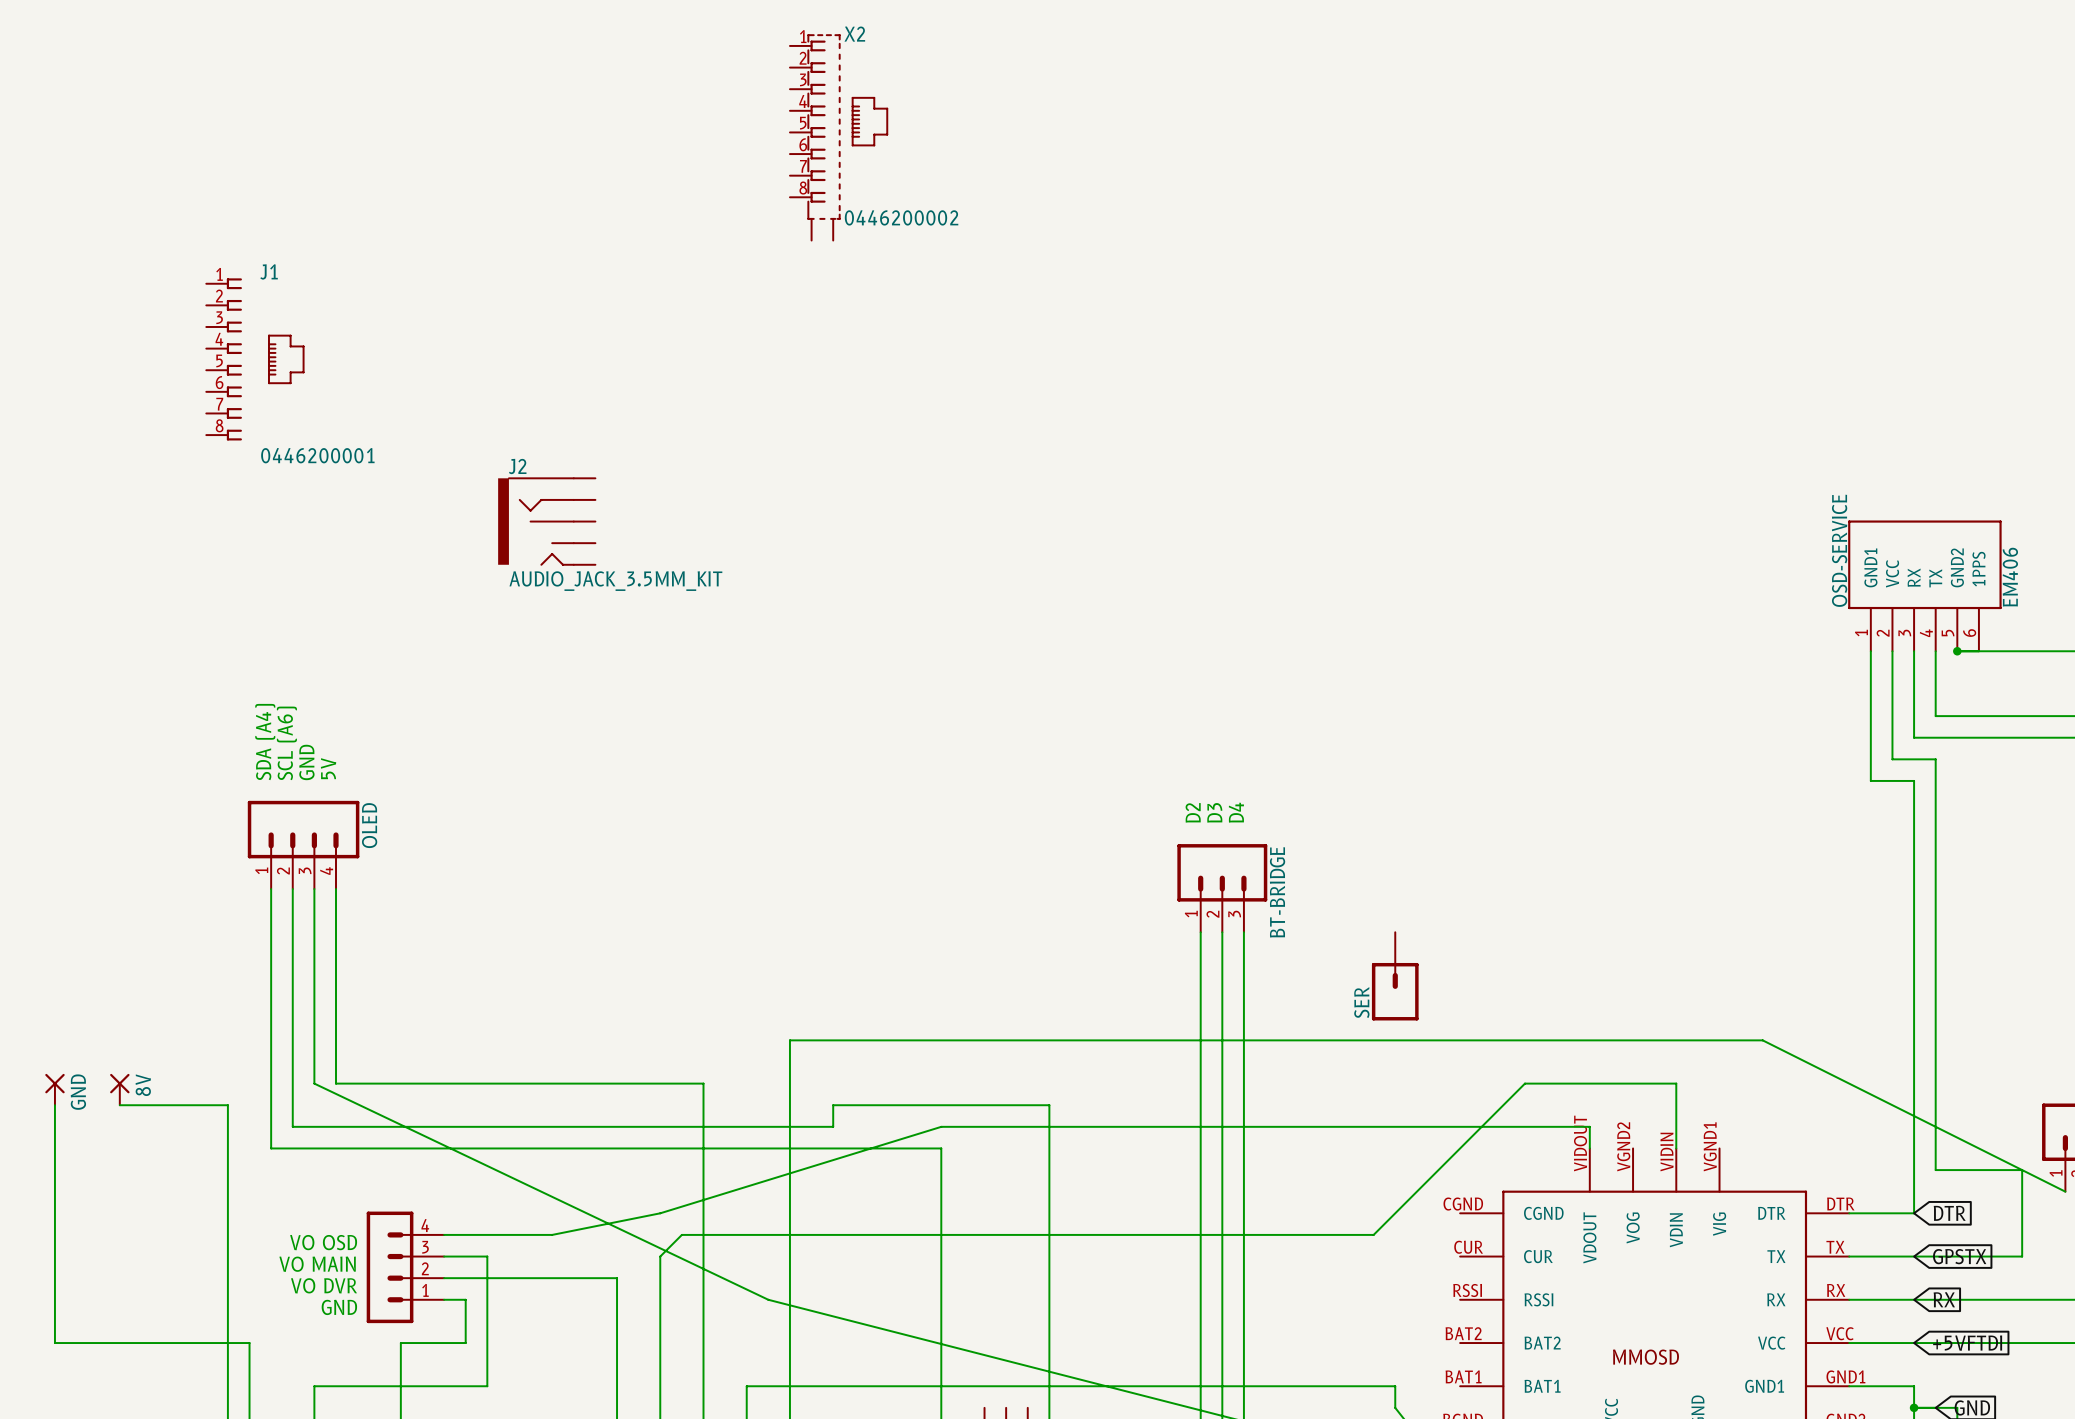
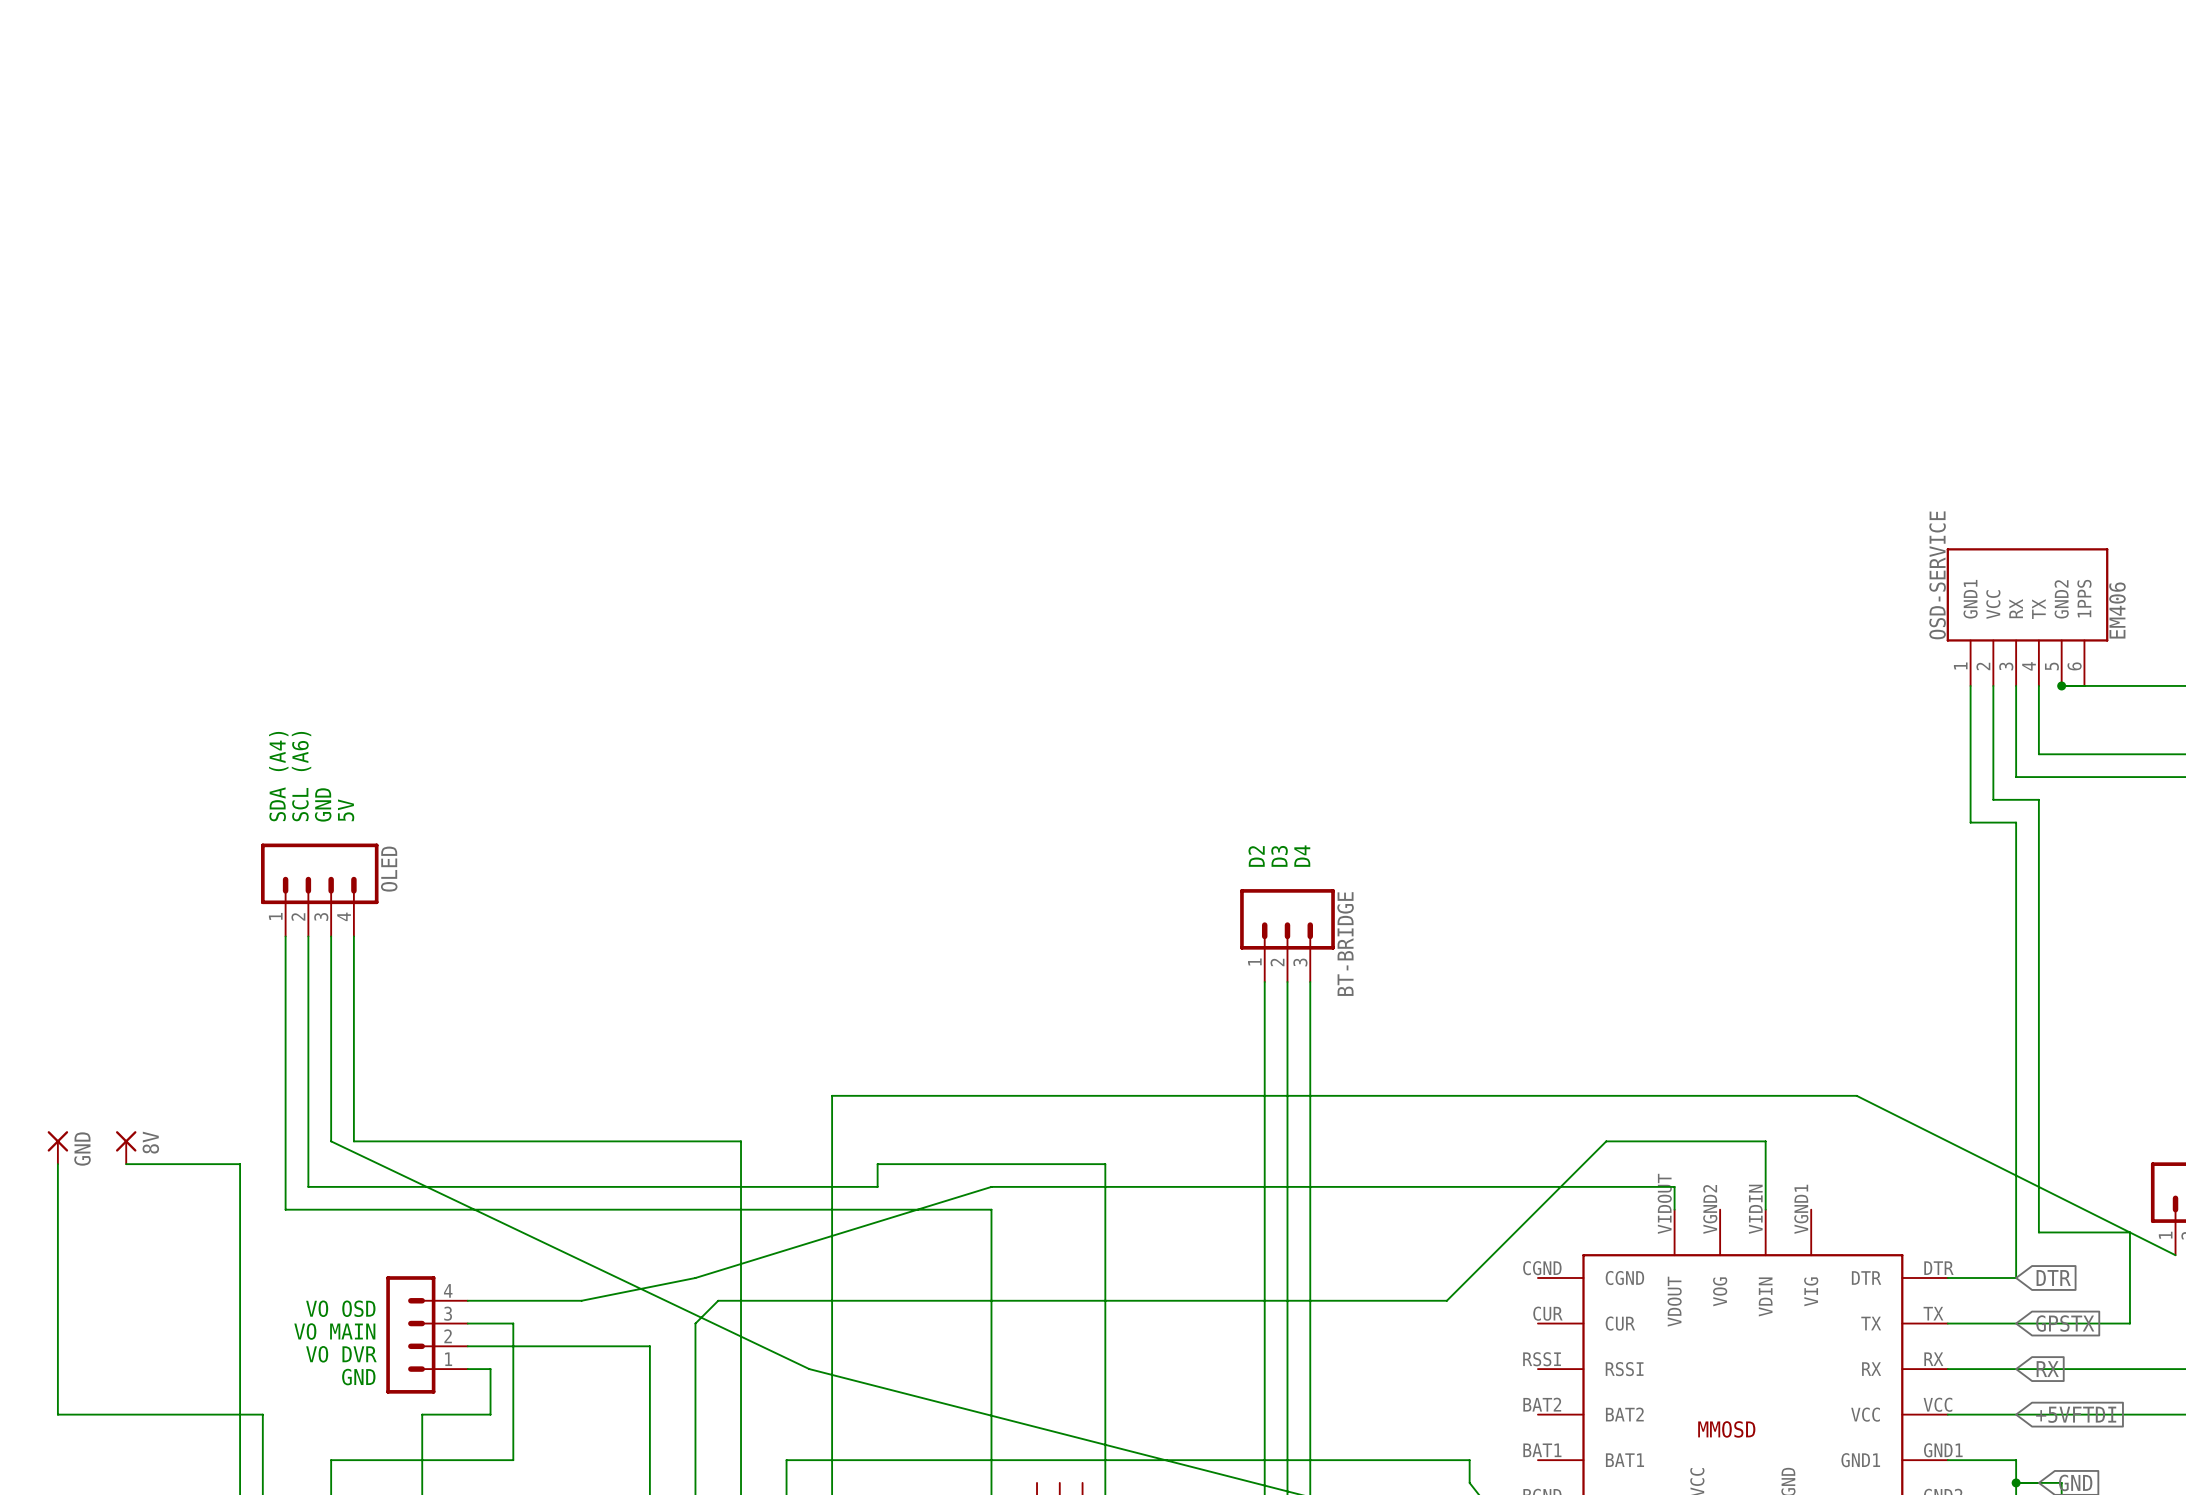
X2: 0446200002 (839, 137) -> none
J1: 0446200001 (255, 359) -> none
J2: AUDIO_JACK_3.5MM_KIT (546, 521) -> none
SER: (1395, 976) -> none

